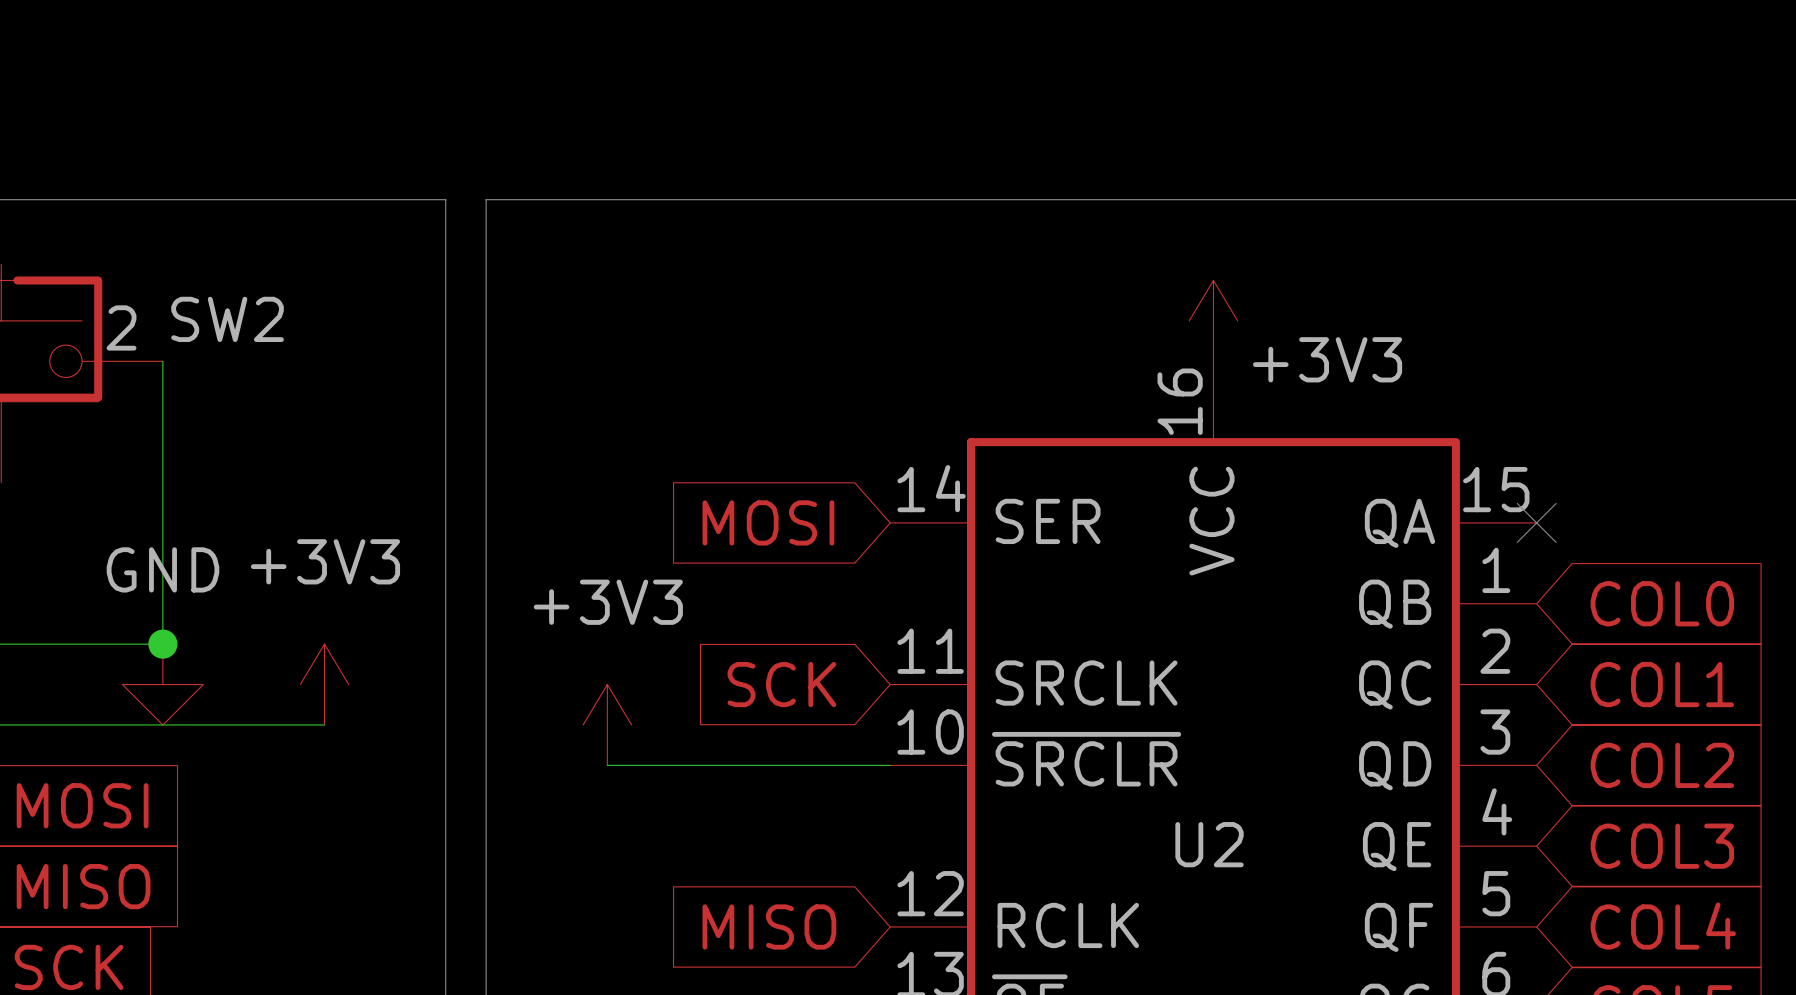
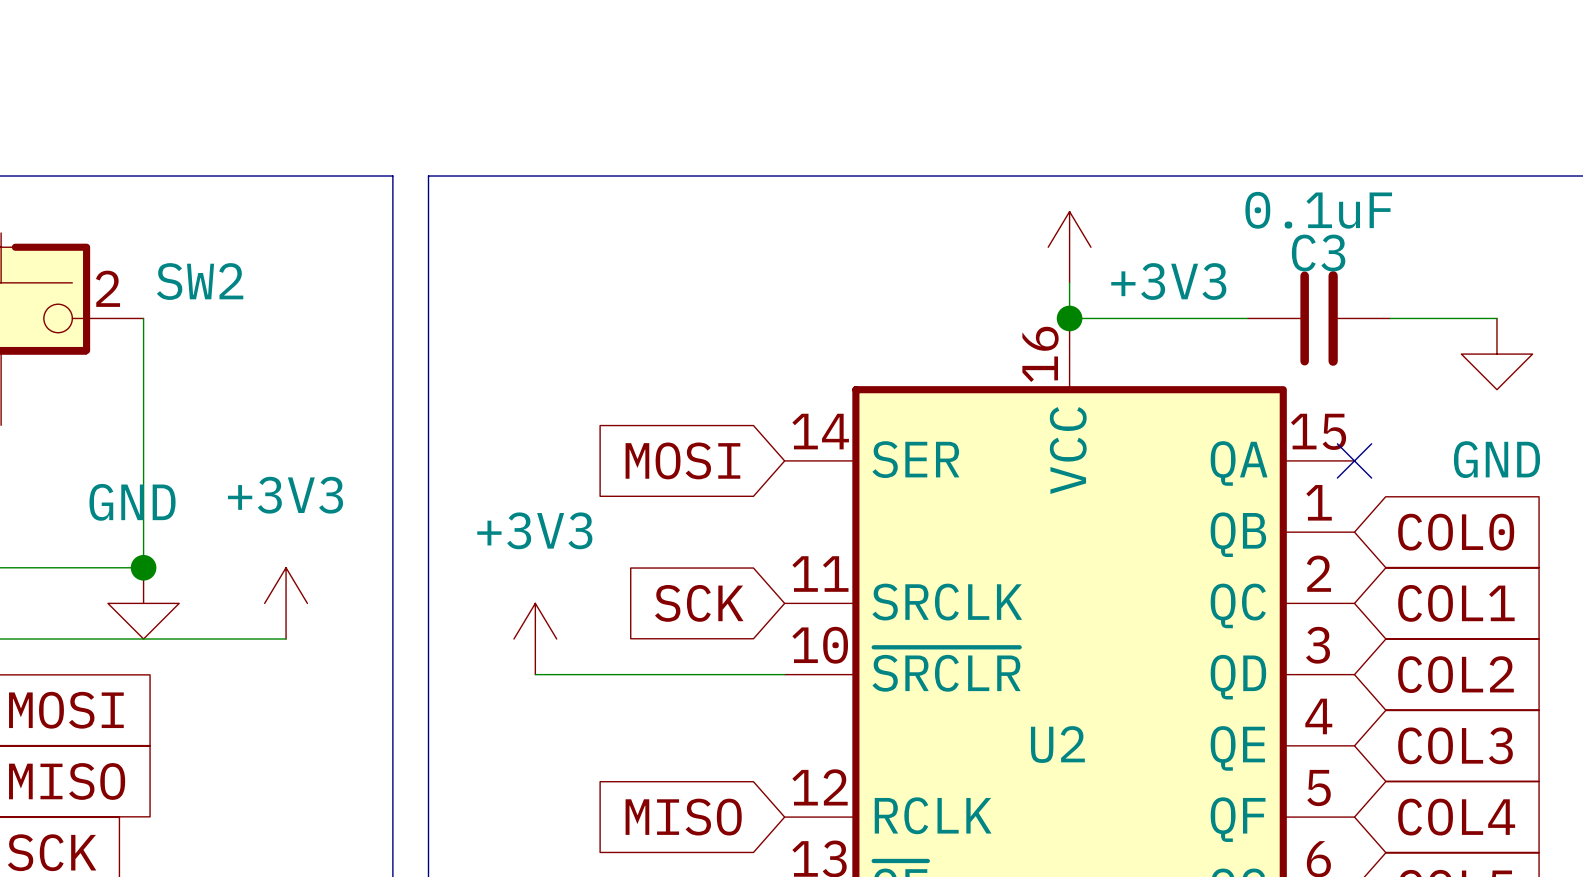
wire: none -> (1069, 282) (1069, 318) (1247, 318)
power symbol position: +3V3 (1213, 320) -> +3V3 (1069, 247)
junction: none -> (1069, 318)
C3: none -> 0.1uF (1318, 318)
wire: none -> (1390, 318) (1496, 318)
power symbol: none -> GND (1496, 354)

